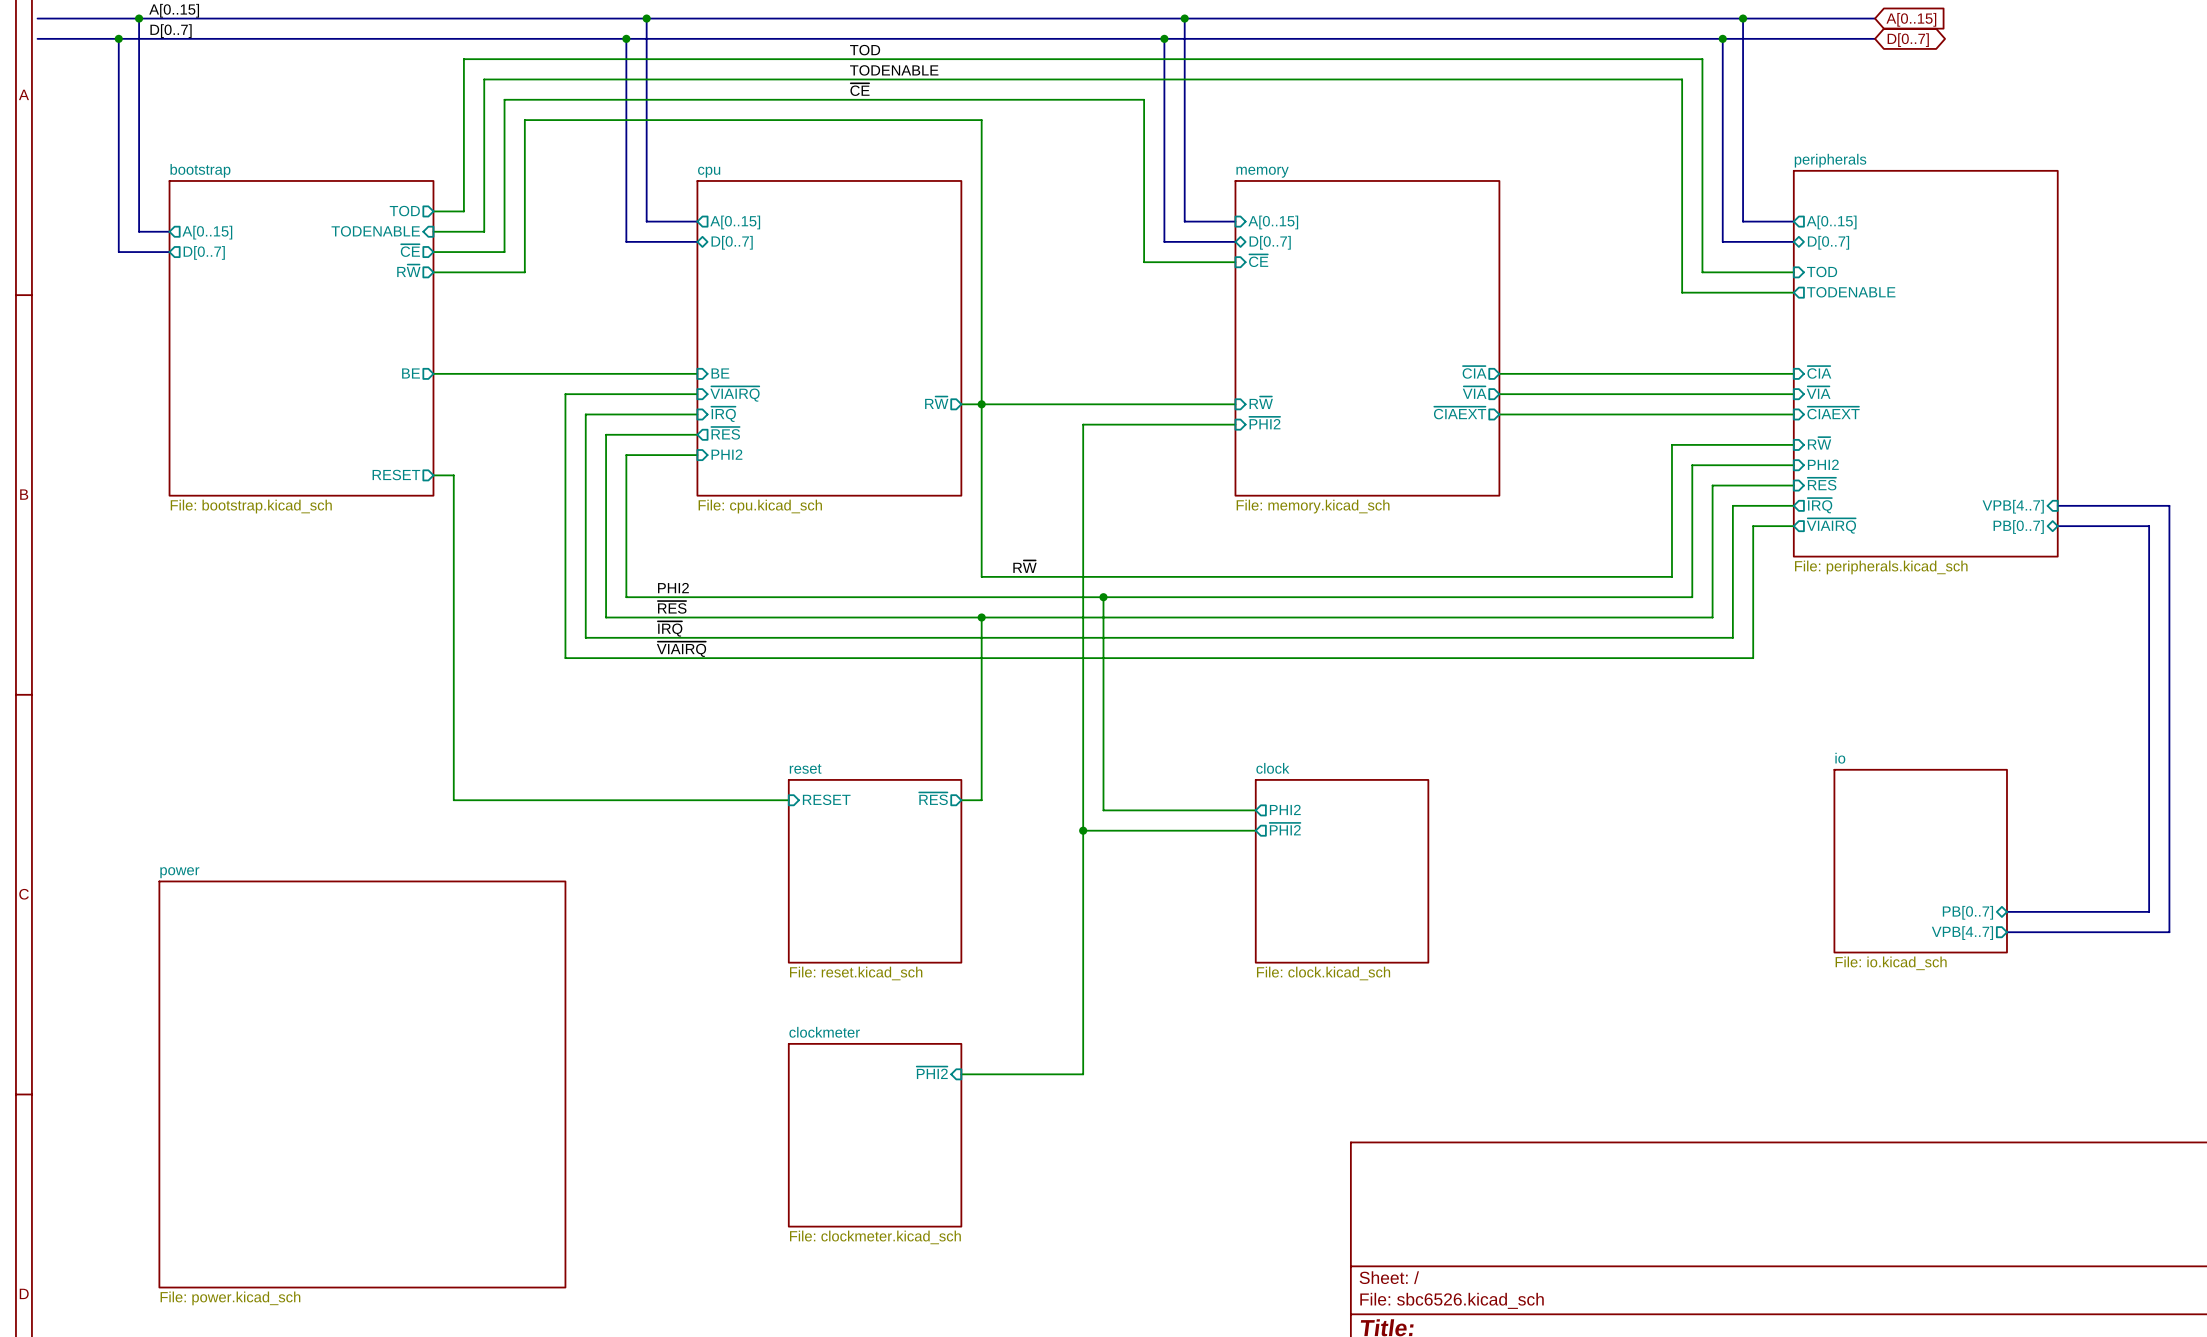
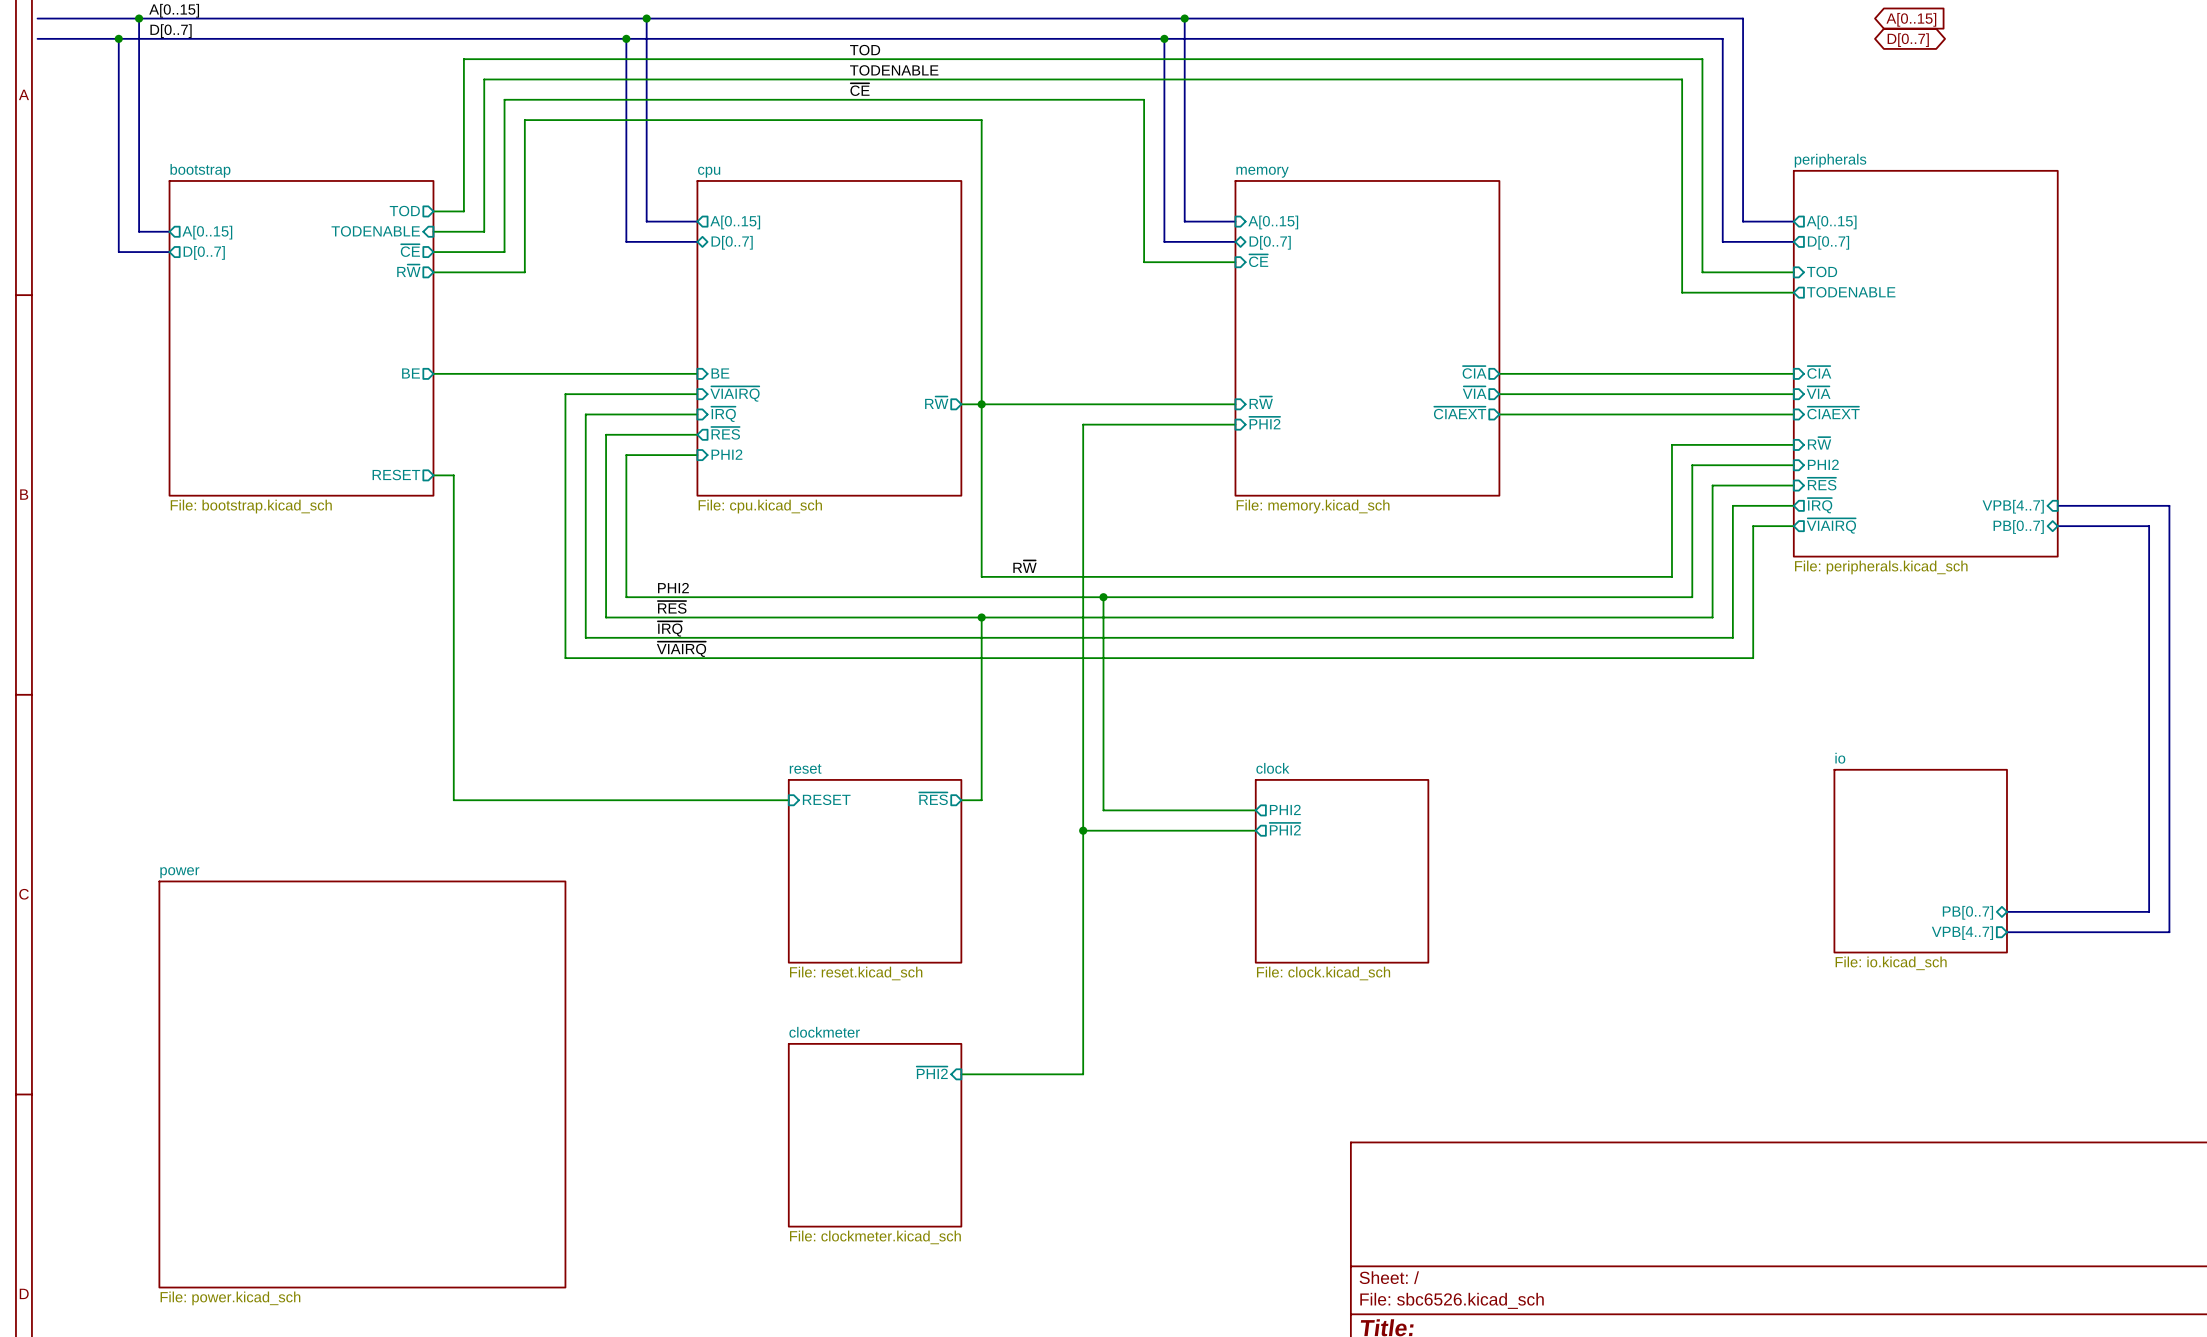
bus: (1743, 18) (1875, 18) -> none
junction: (1743, 18) -> none
bus: (1722, 38) (1875, 38) -> none
junction: (1722, 38) -> none
sheet pin shape: bidirectional (1828, 242) -> output (1828, 242)

